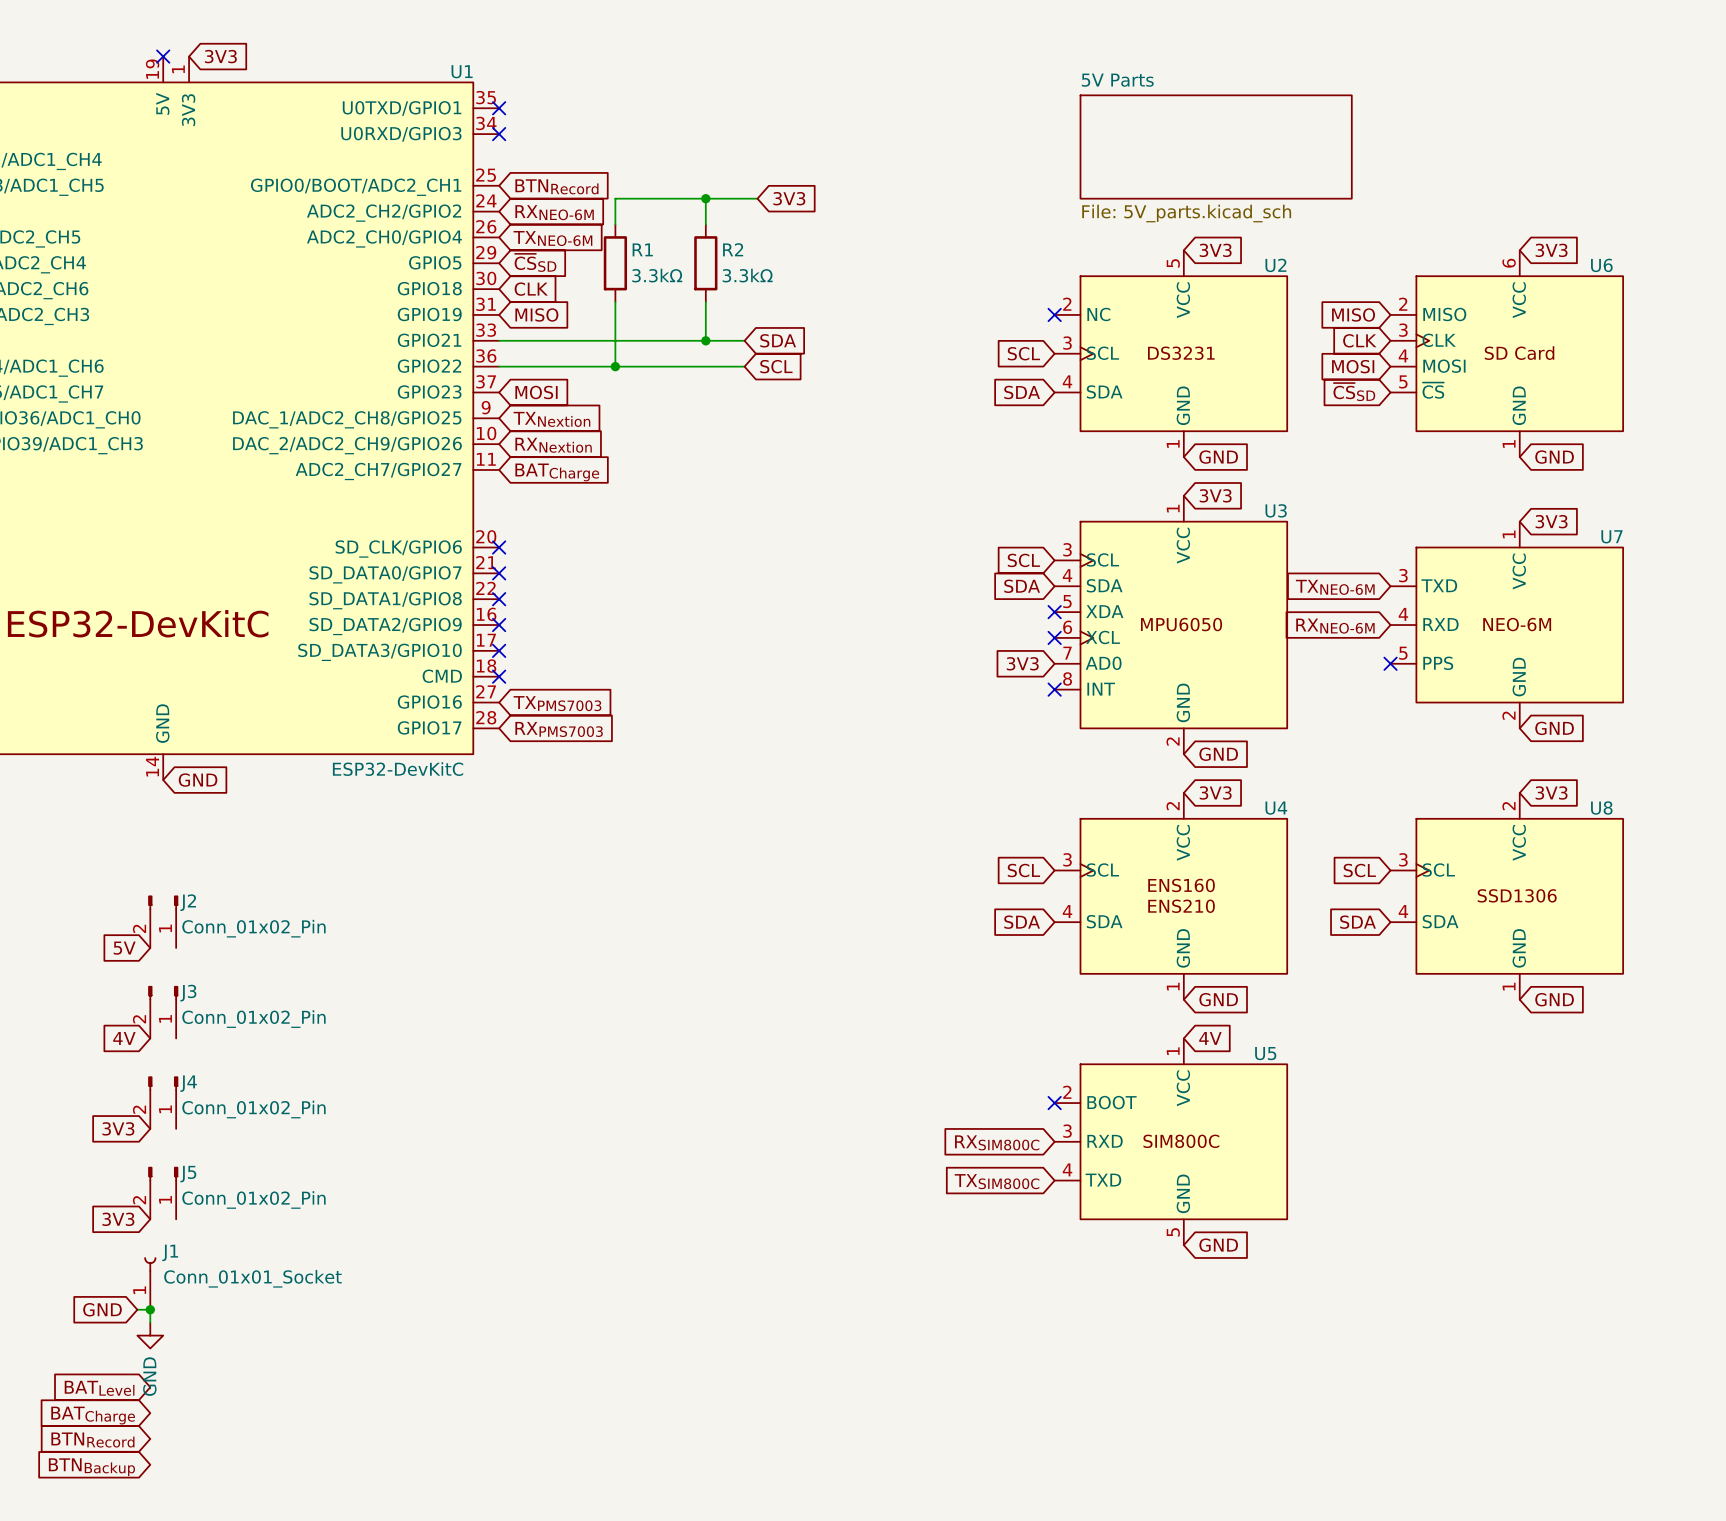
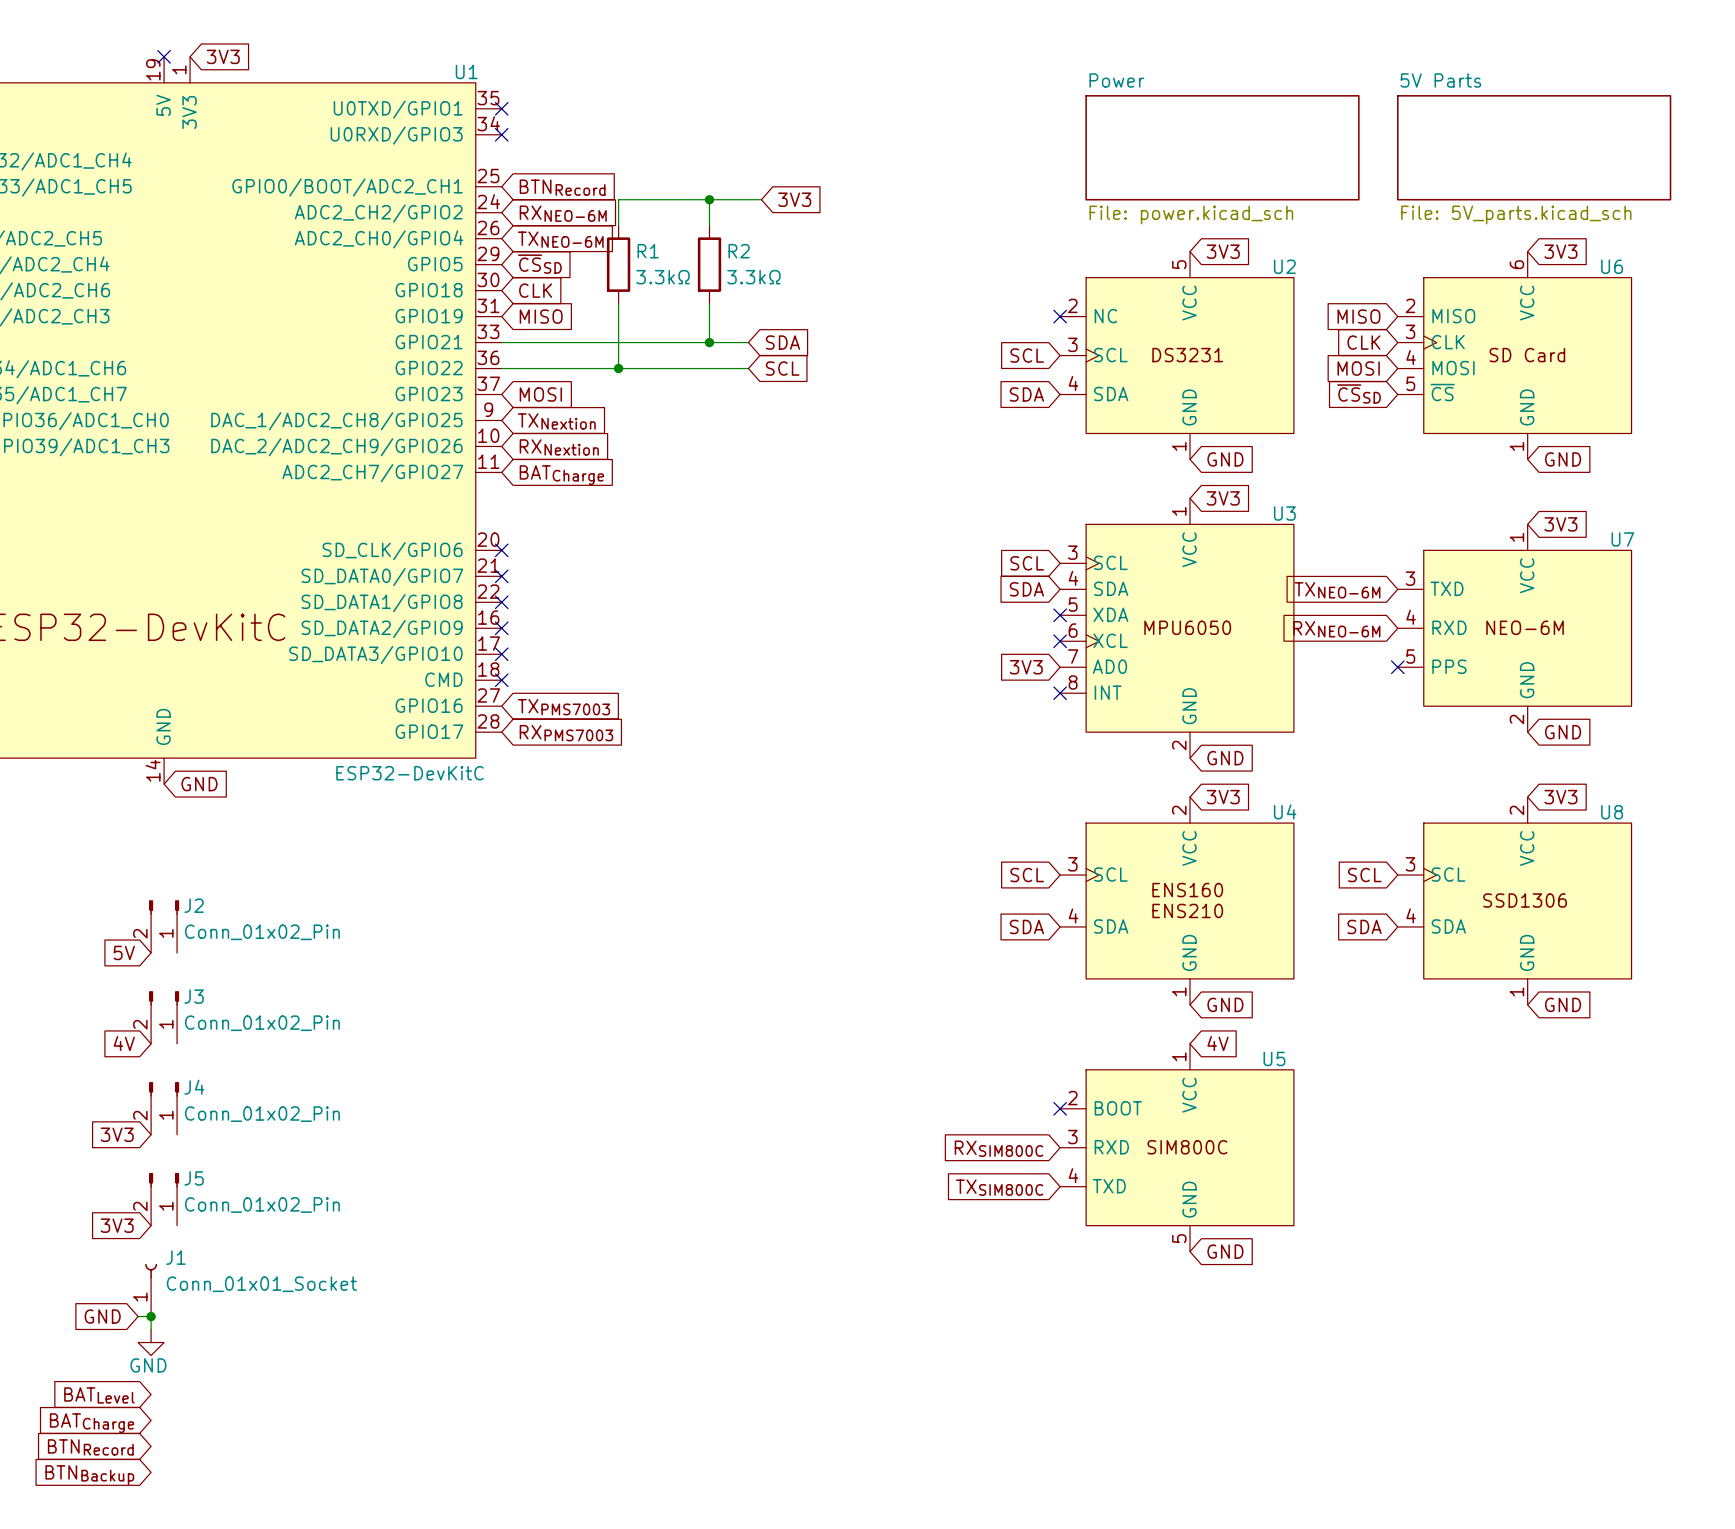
sheet 5V Parts name: 5V Parts (1117, 80) -> Power (1116, 80)
sheet 5V Parts: none -> File: 5V_parts.kicad_sch (1534, 147)
sheet 5V Parts value: File: 5V_parts.kicad_sch (1186, 213) -> File: power.kicad_sch (1191, 214)
power symbol text rotation: 0° (149, 1376) -> 90° clockwise (148, 1365)

